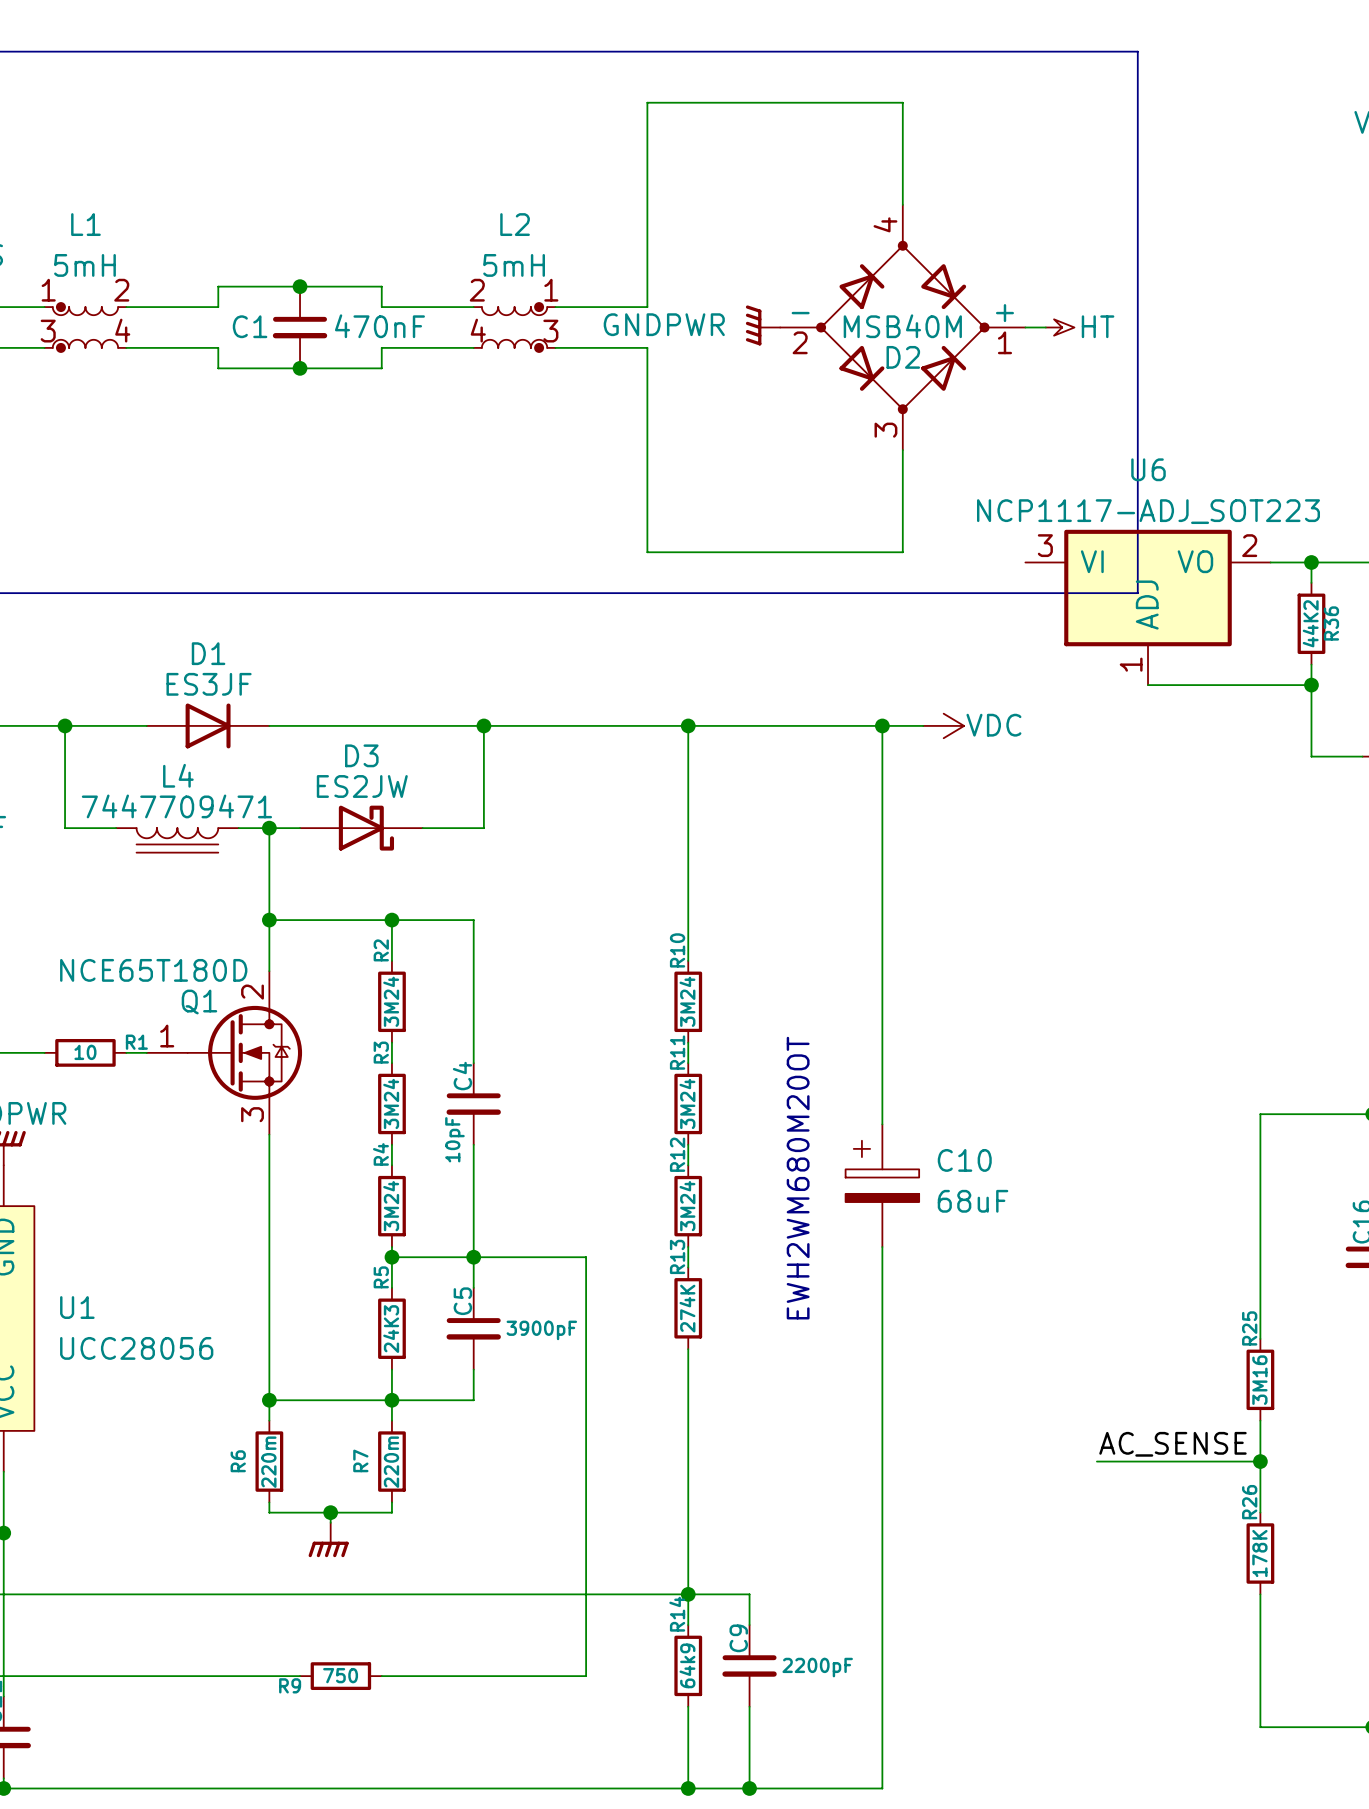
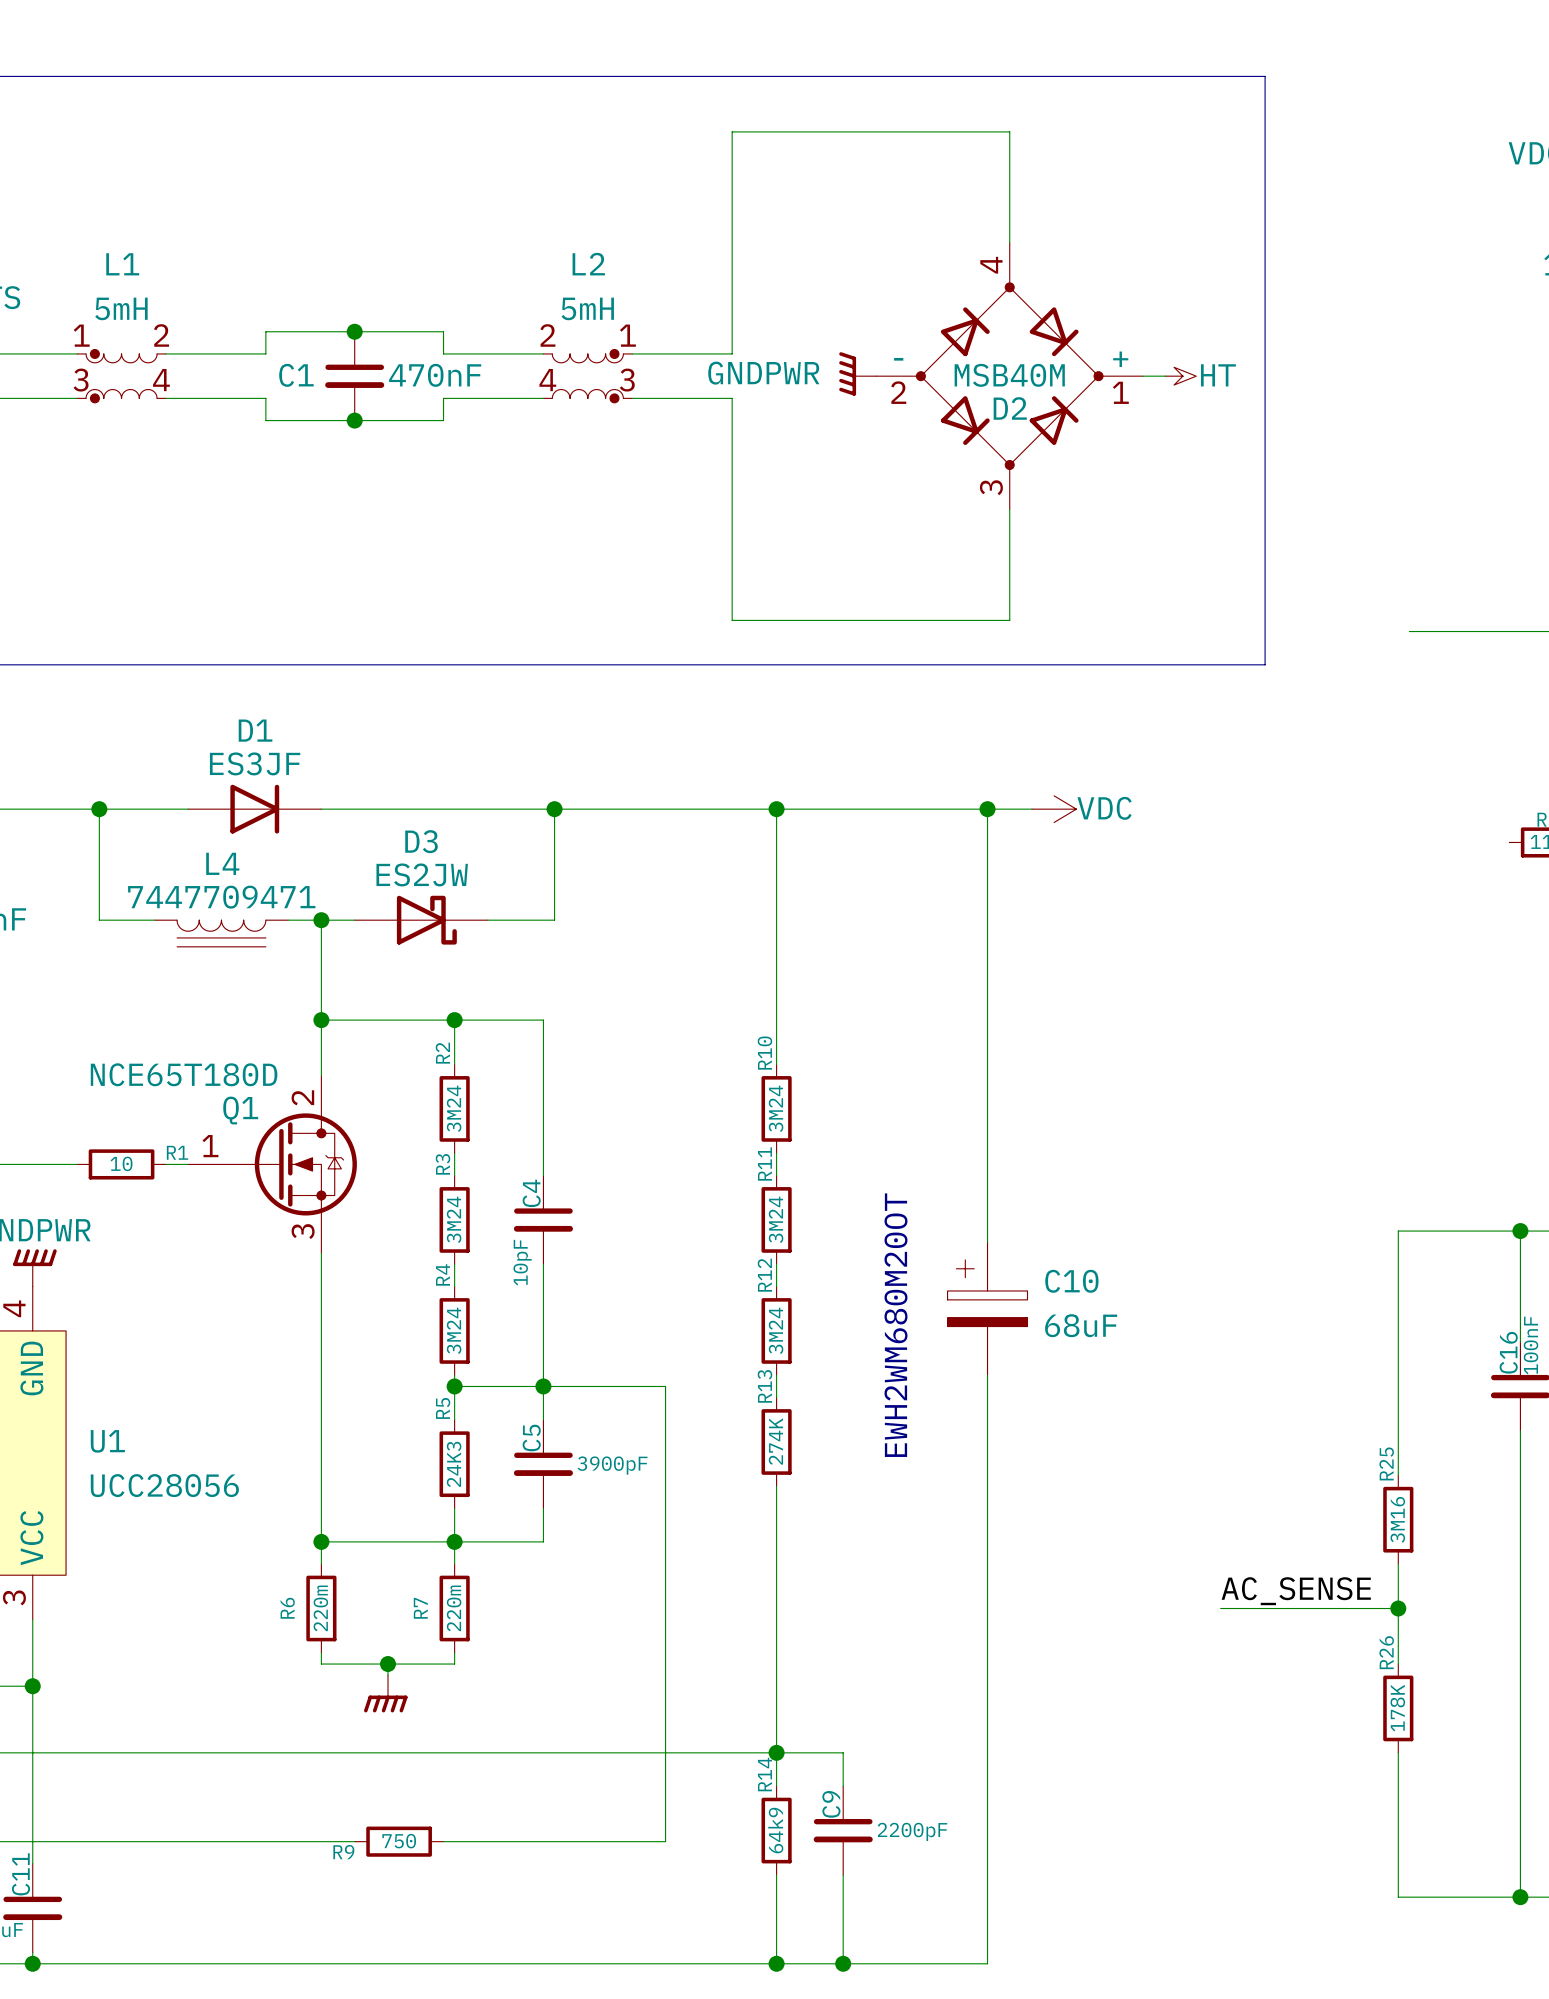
wire: (1311, 562) (1311, 582) -> none
junction: (1311, 562) -> none
U6: NCP1117-ADJ_SOT223 (1148, 607) -> none
R36: 44K2 (1311, 623) -> none
wire: (1311, 664) (1311, 756) (1362, 756) -> none
wire: (1148, 685) (1311, 685) -> none
junction: (1311, 685) -> none

